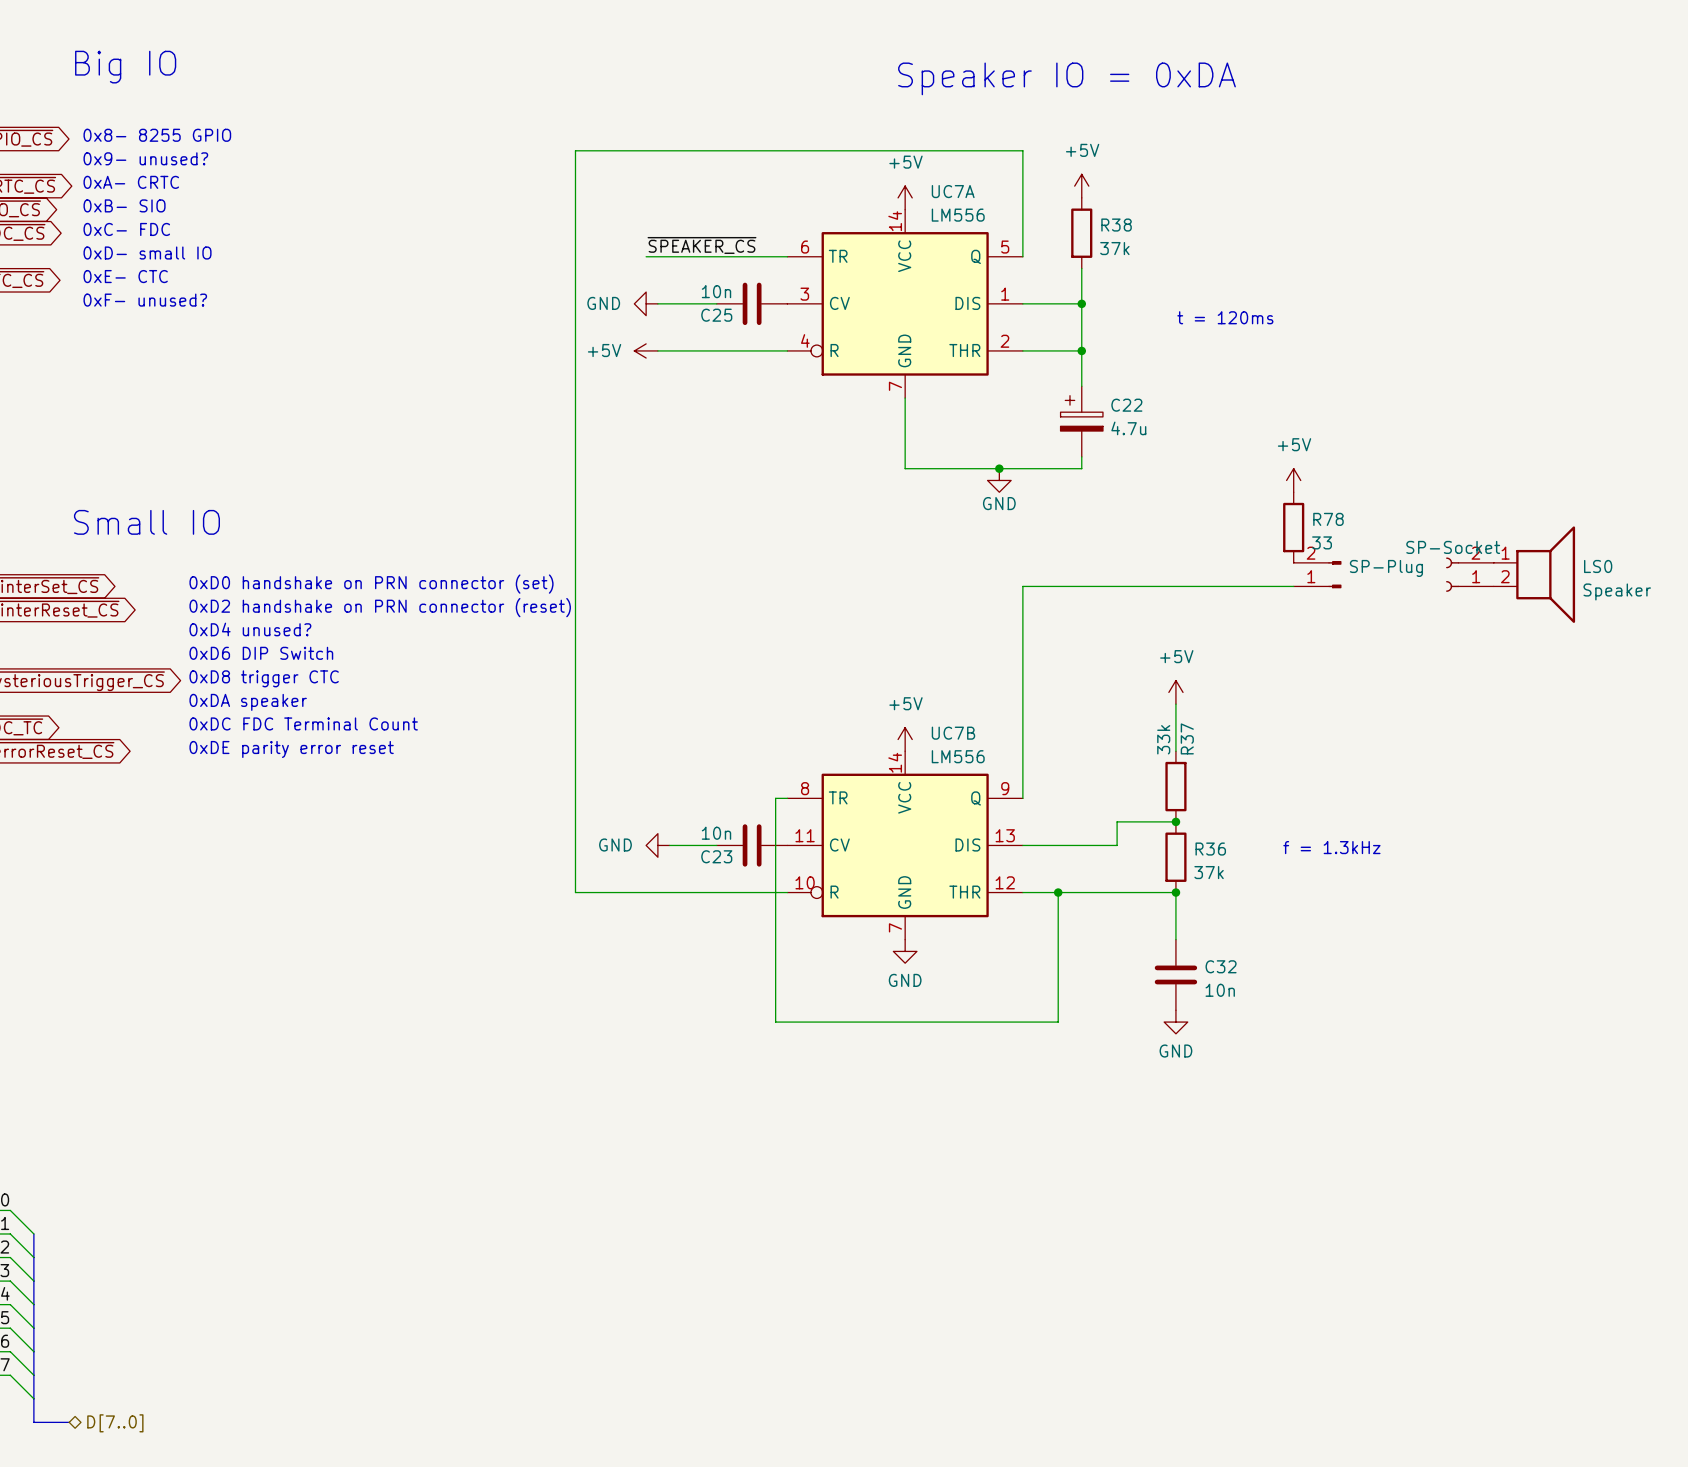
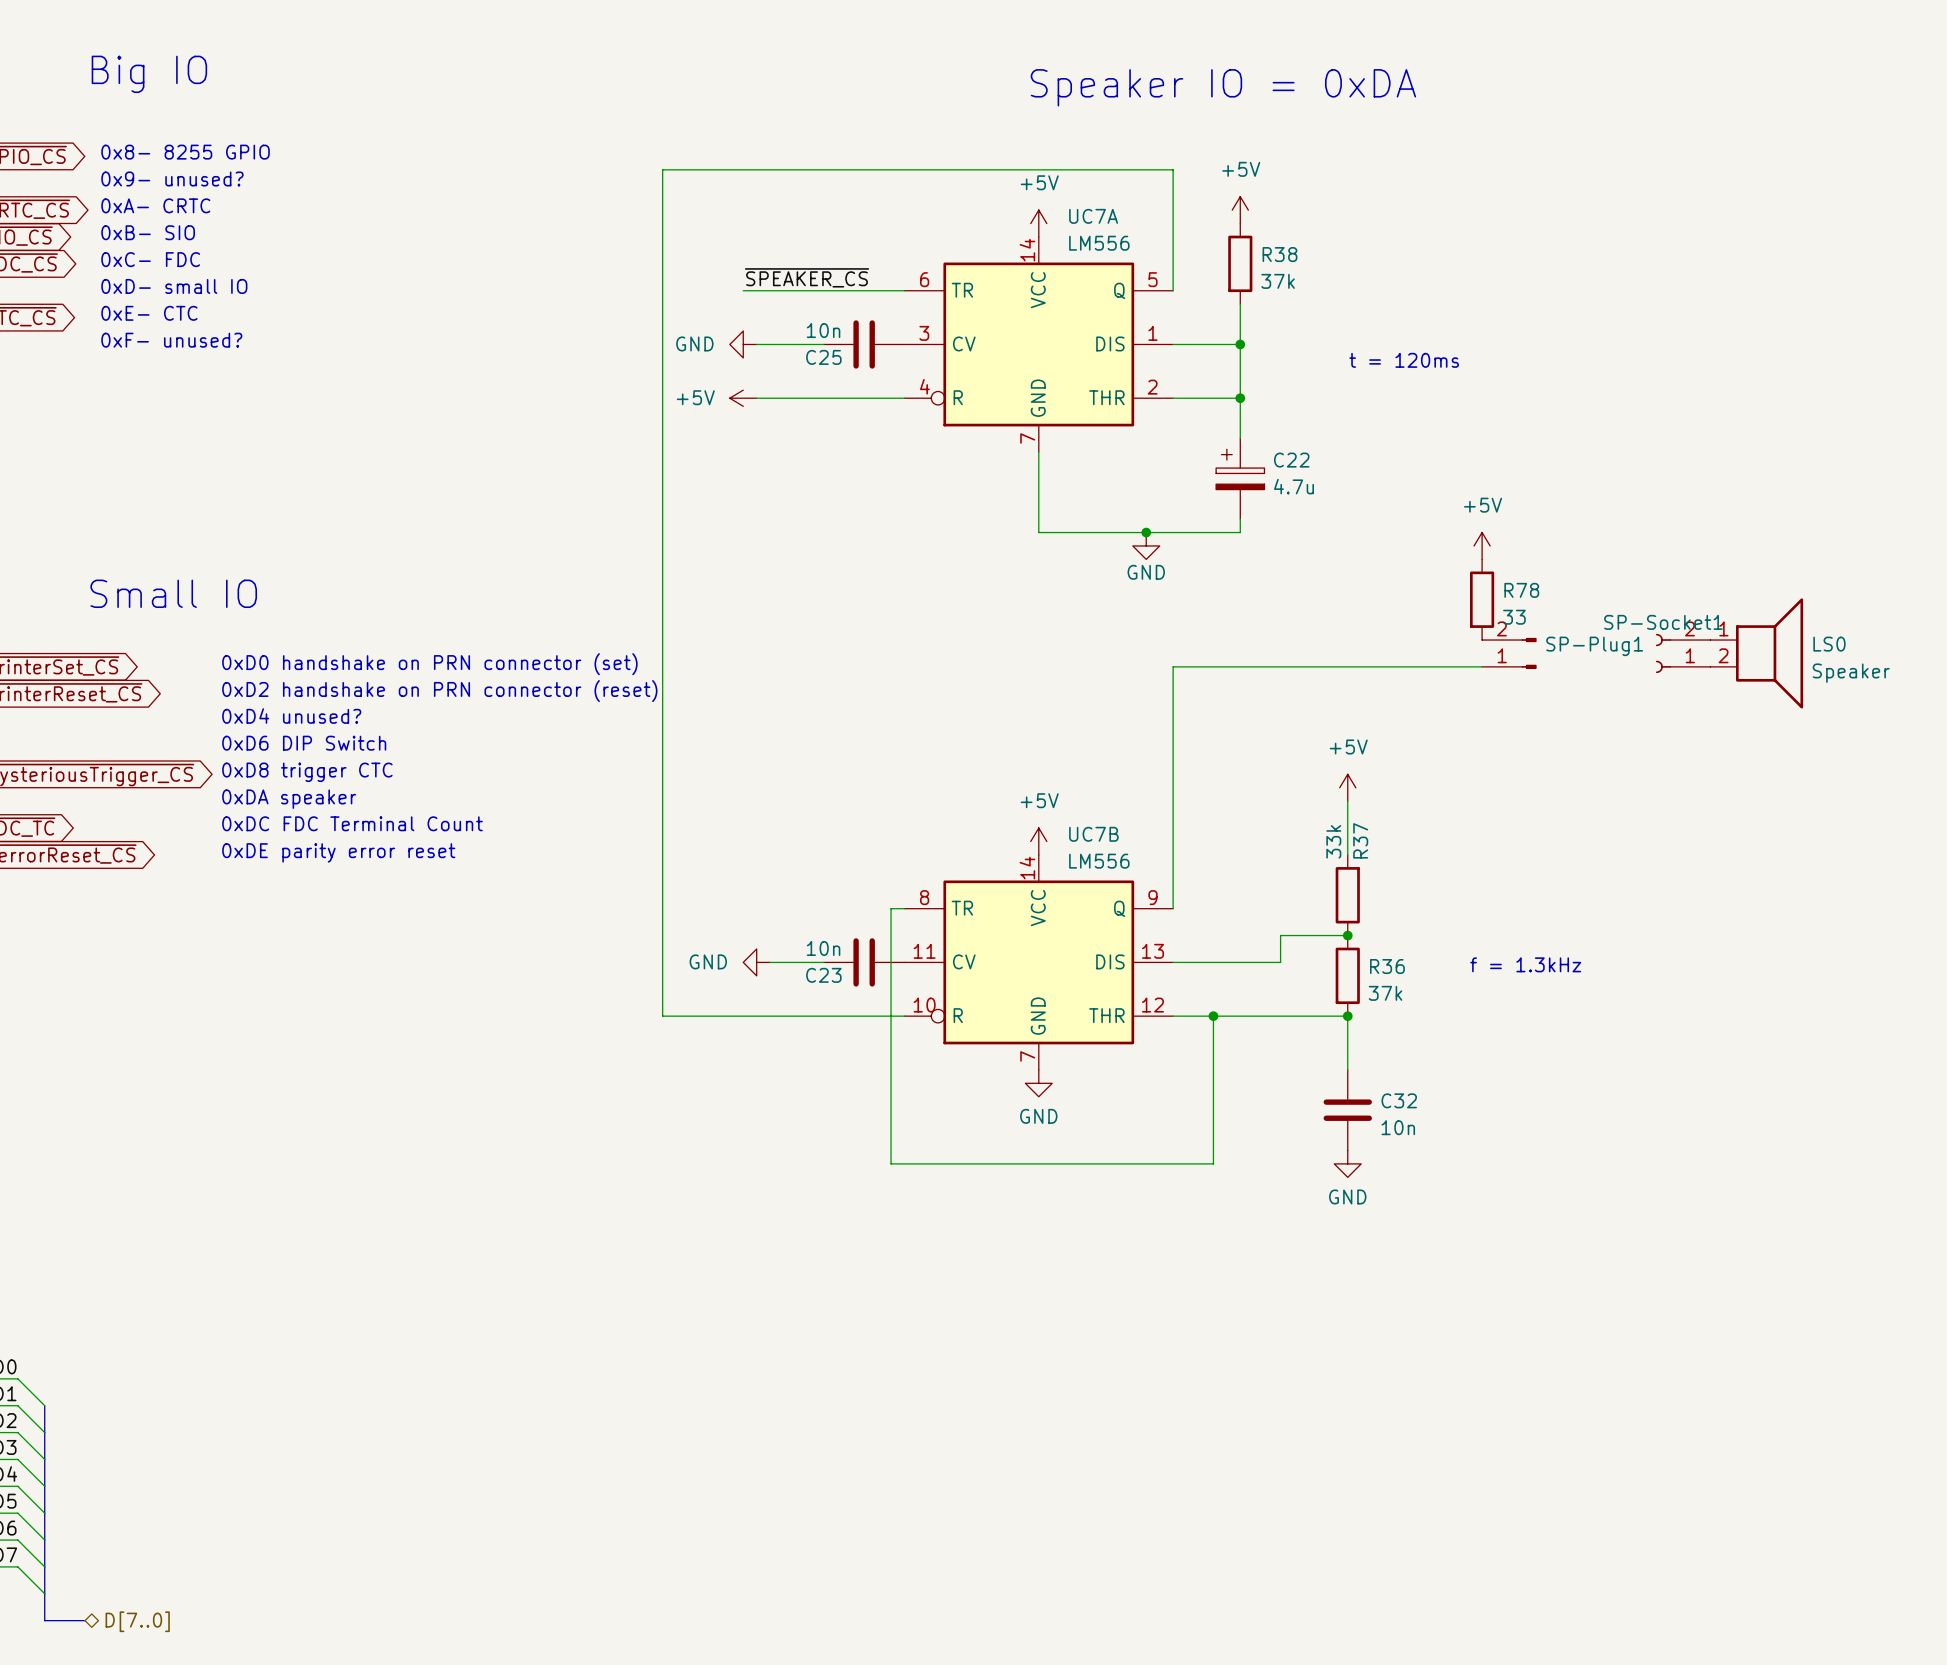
SP-Socket name: SP-Socket (1453, 547) -> SP-Socket1 (1663, 622)
SP-Plug name: SP-Plug (1386, 568) -> SP-Plug1 (1594, 646)

